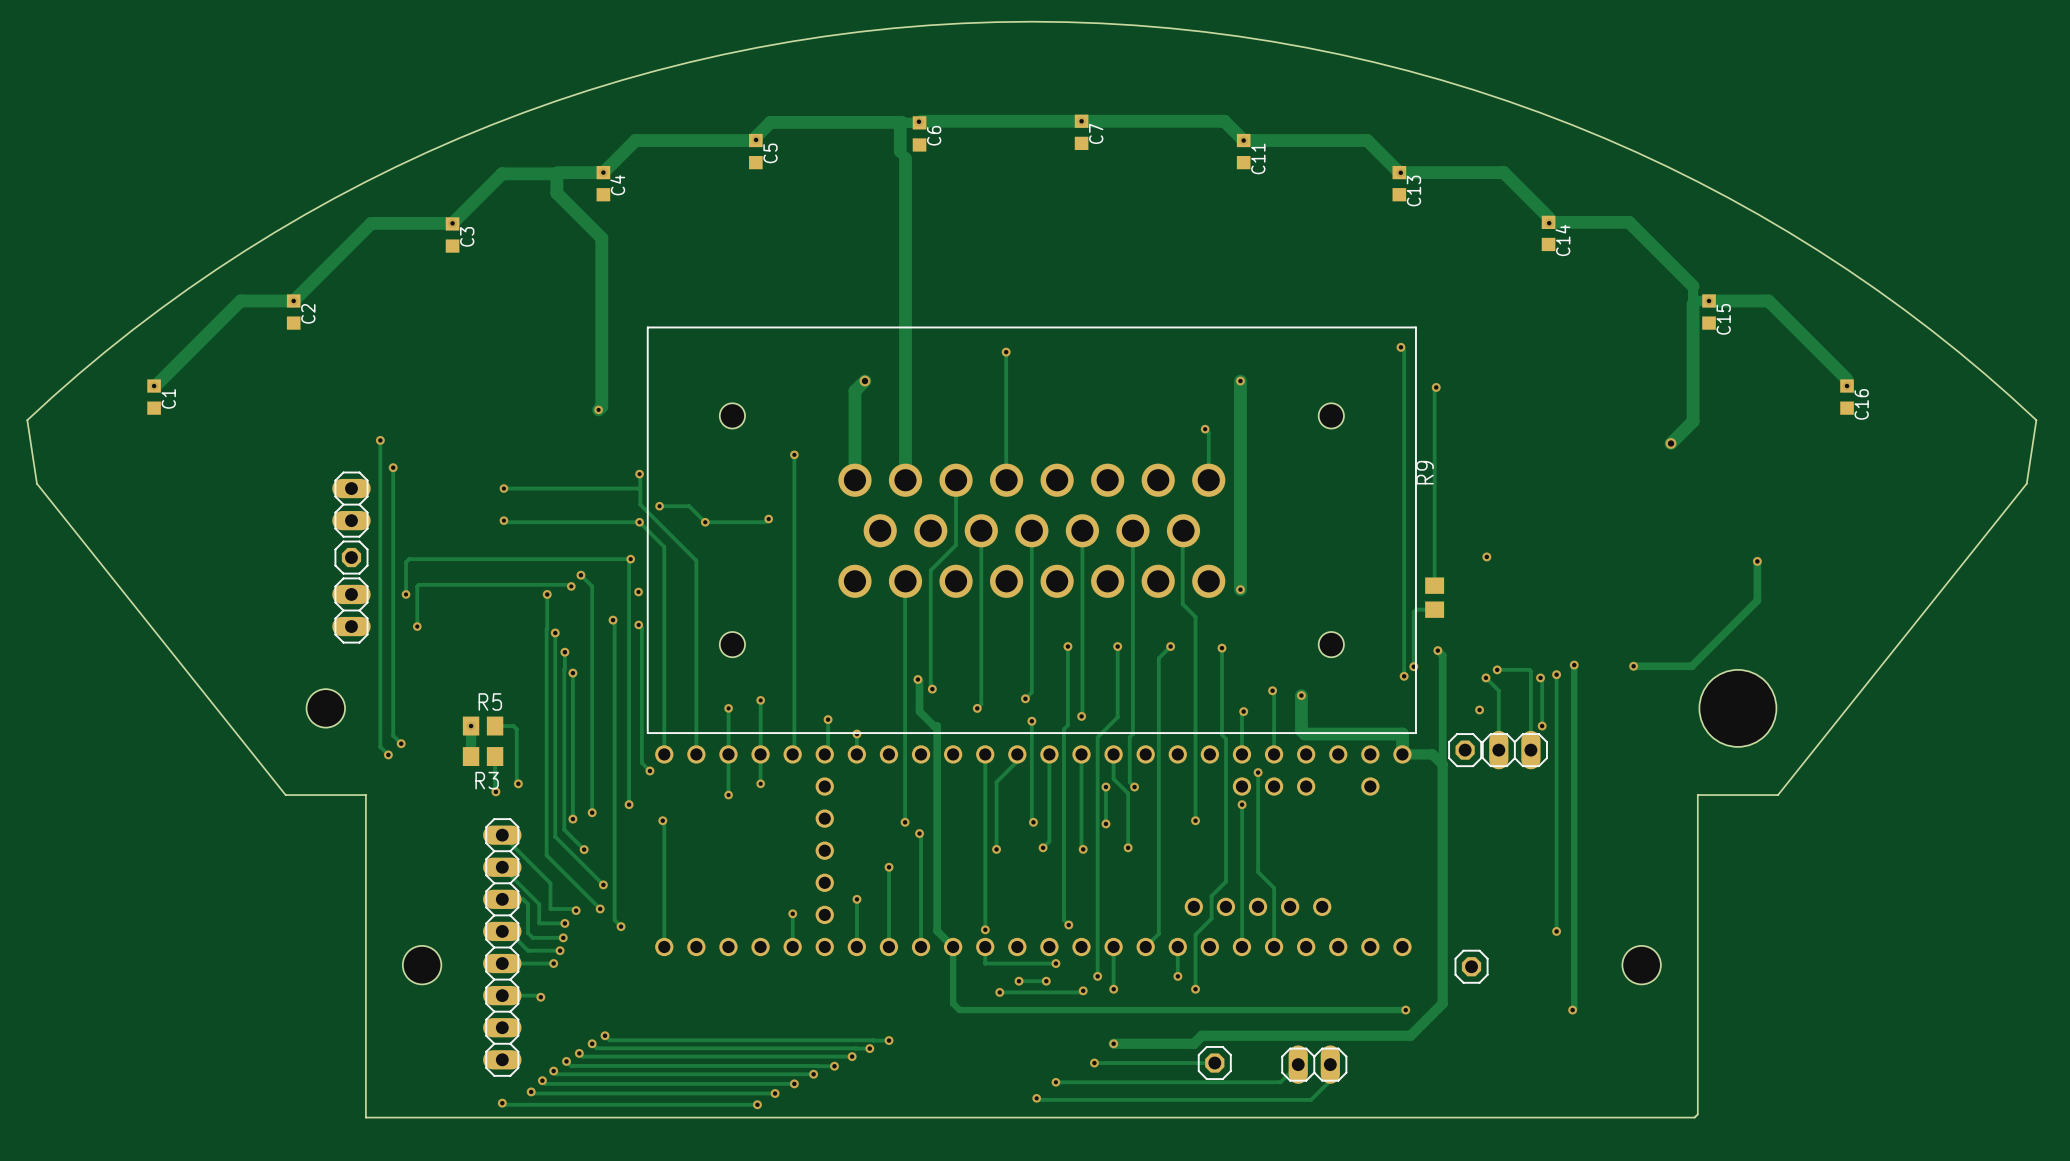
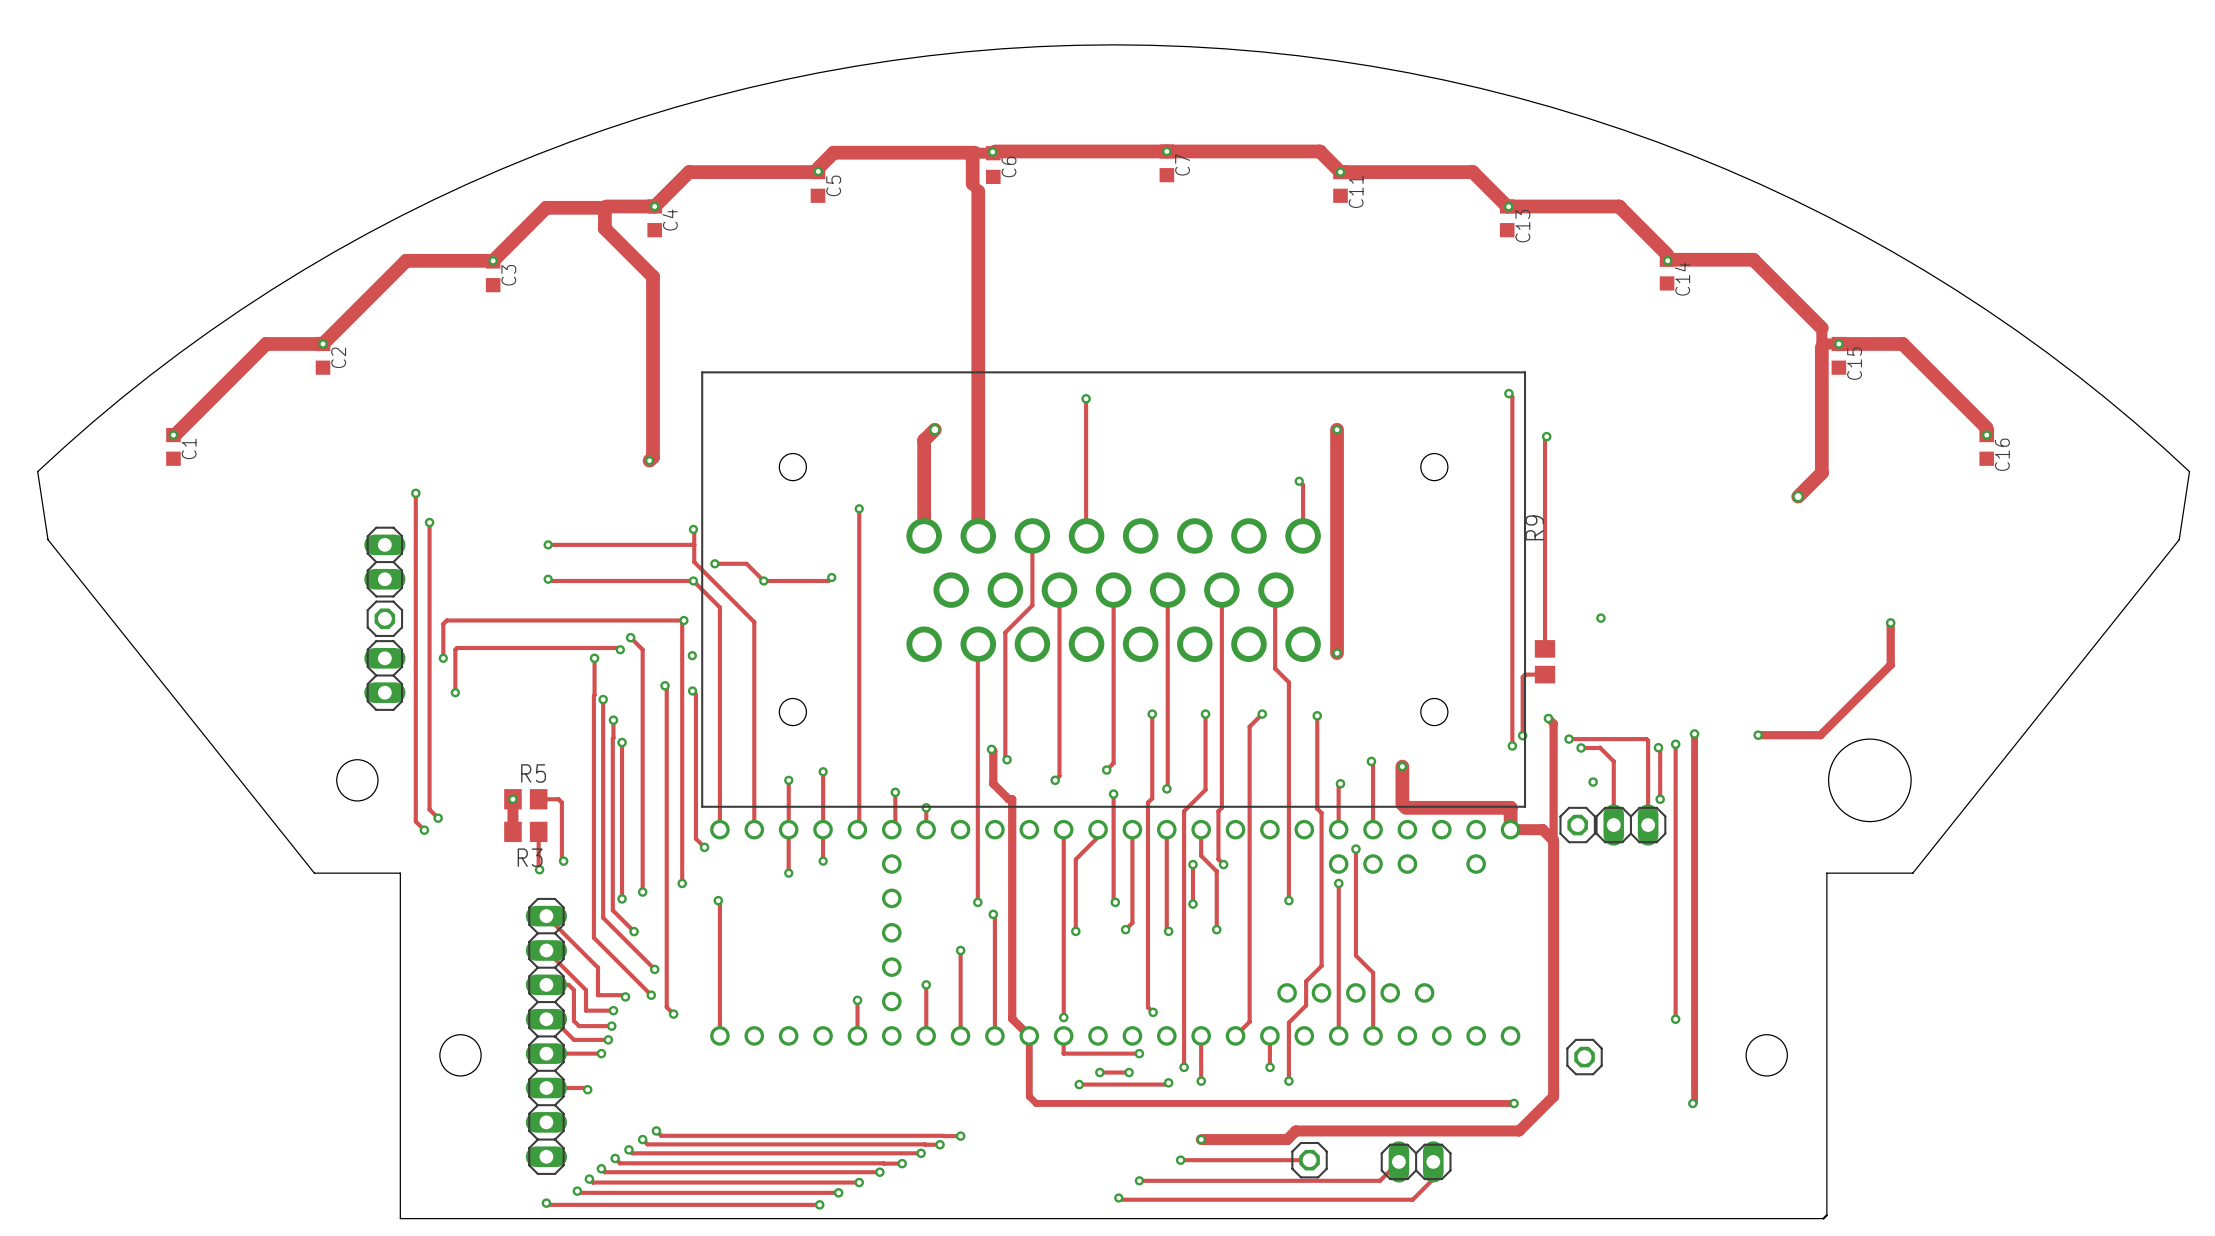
track: none -> (1569, 739) (1612, 739)
via: none -> (1569, 739)
via: (1497, 669) -> none
track: none -> (1600, 747) (1581, 747)
via: (1485, 677) -> none
via: none -> (1581, 747)

